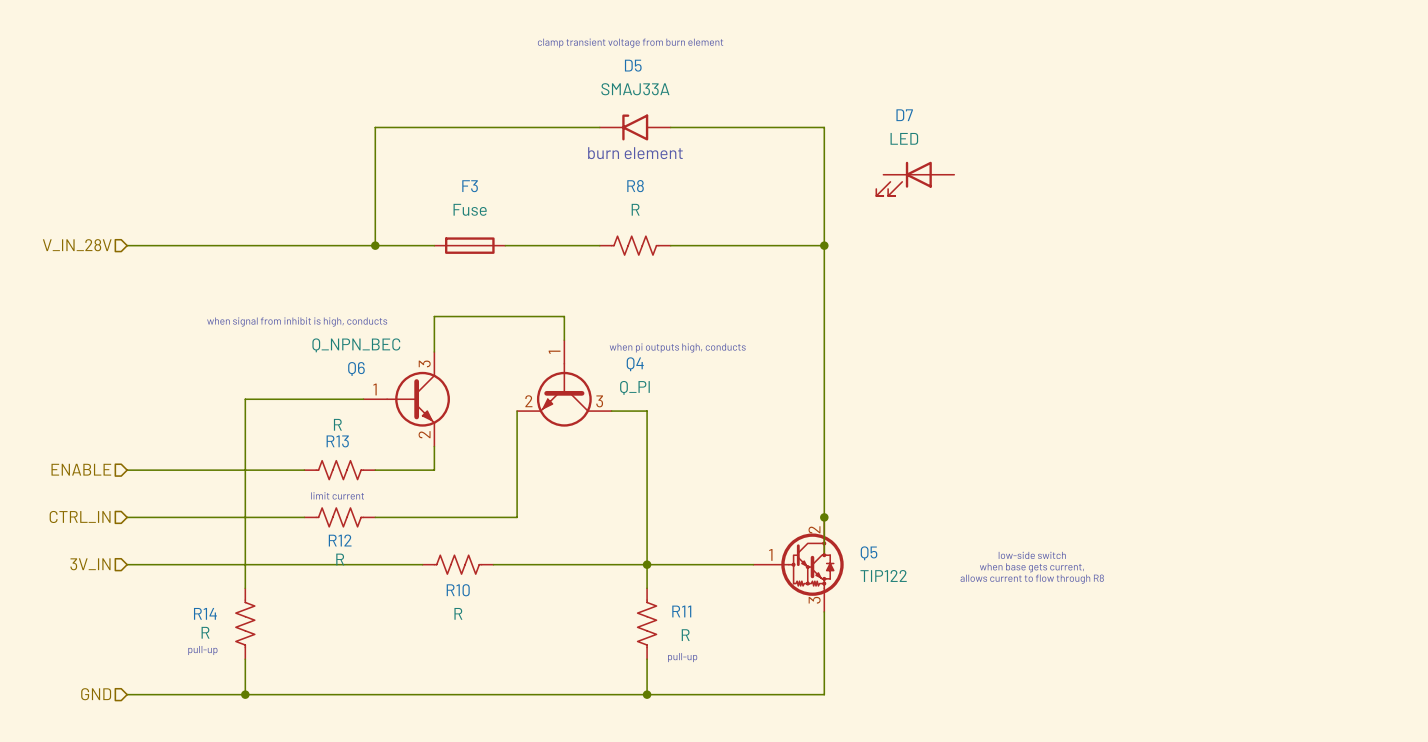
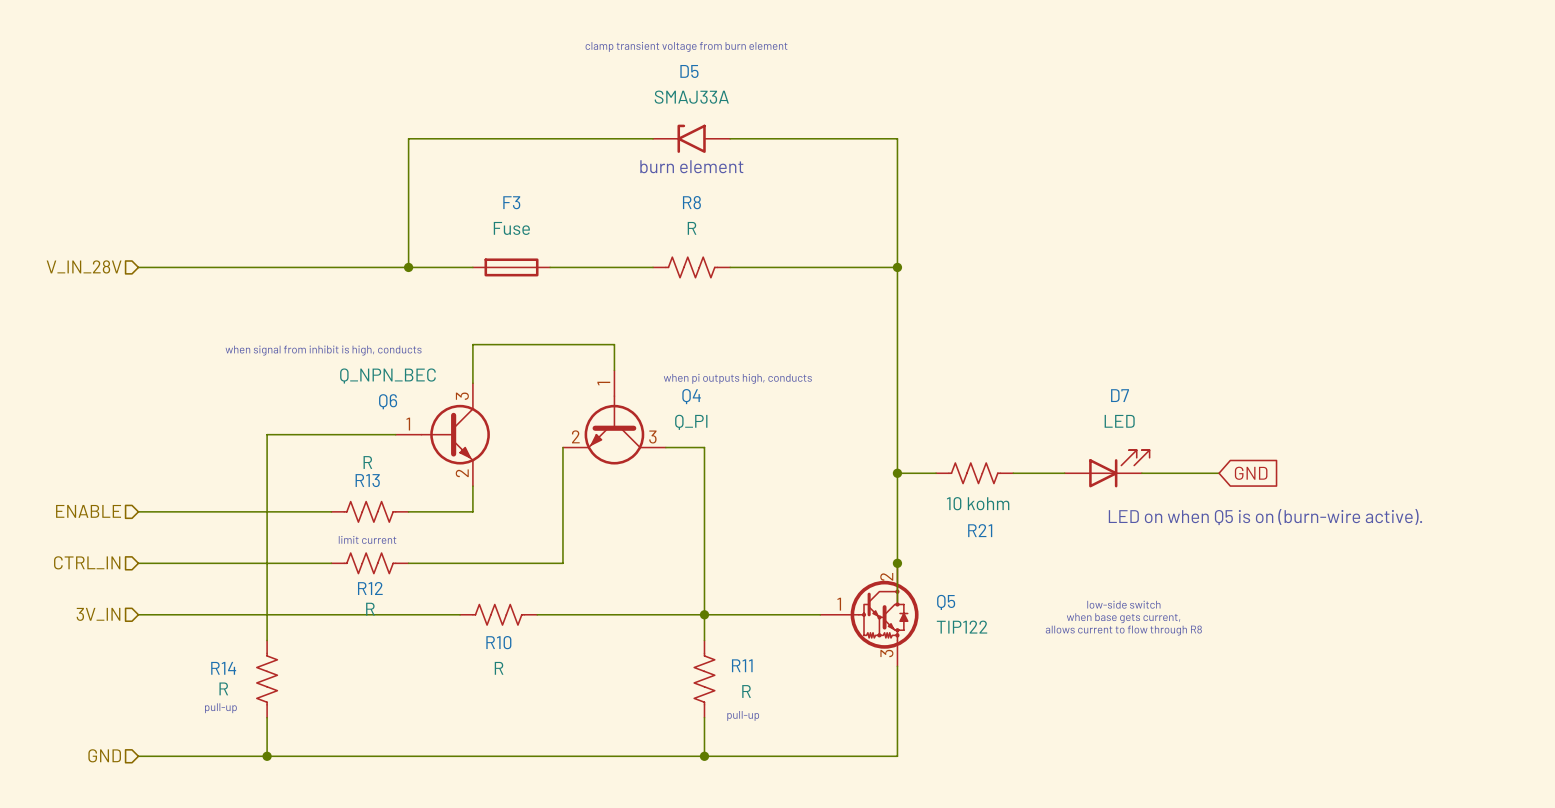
D7 name position: D7 (904, 115) -> D7 (1120, 395)
D7 value position: LED (904, 138) -> LED (1119, 421)
D7 rotation: 0° (904, 178) -> 180° (1119, 468)
D7 position: (915, 178) -> (1107, 468)
wire: none -> (897, 473) (936, 473)
junction: none -> (897, 473)
R21: none -> 10 kohm (974, 473)
wire: none -> (1013, 473) (1064, 473)
wire: none -> (1141, 473) (1219, 473)
global label: none -> GND (1251, 473)
text: none -> LED on when Q5 is on (burn-wire active). (1265, 517)

